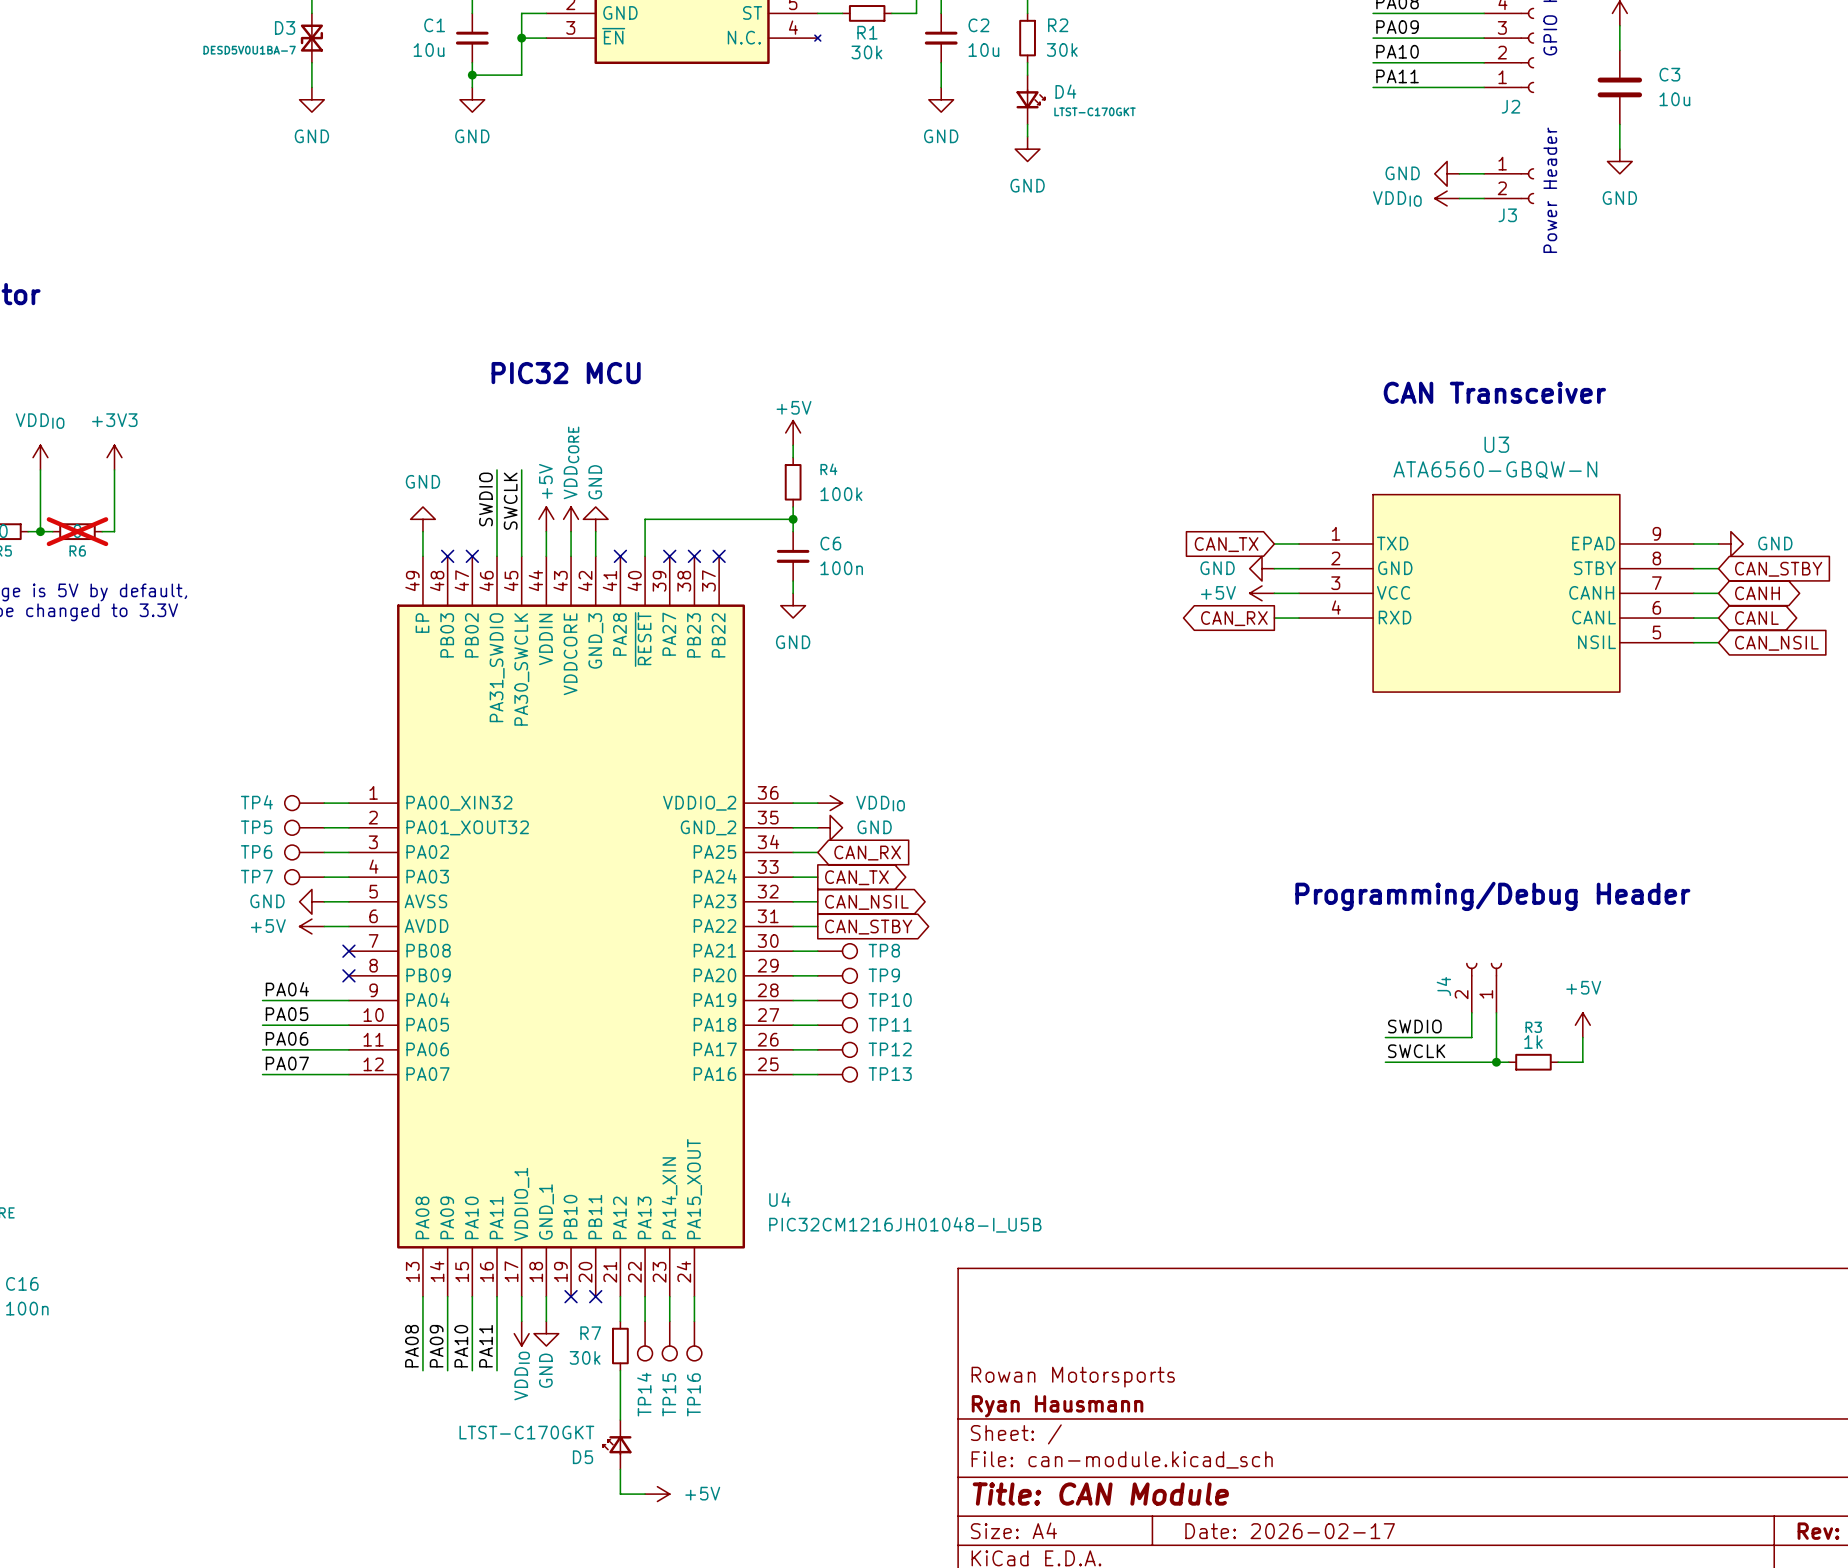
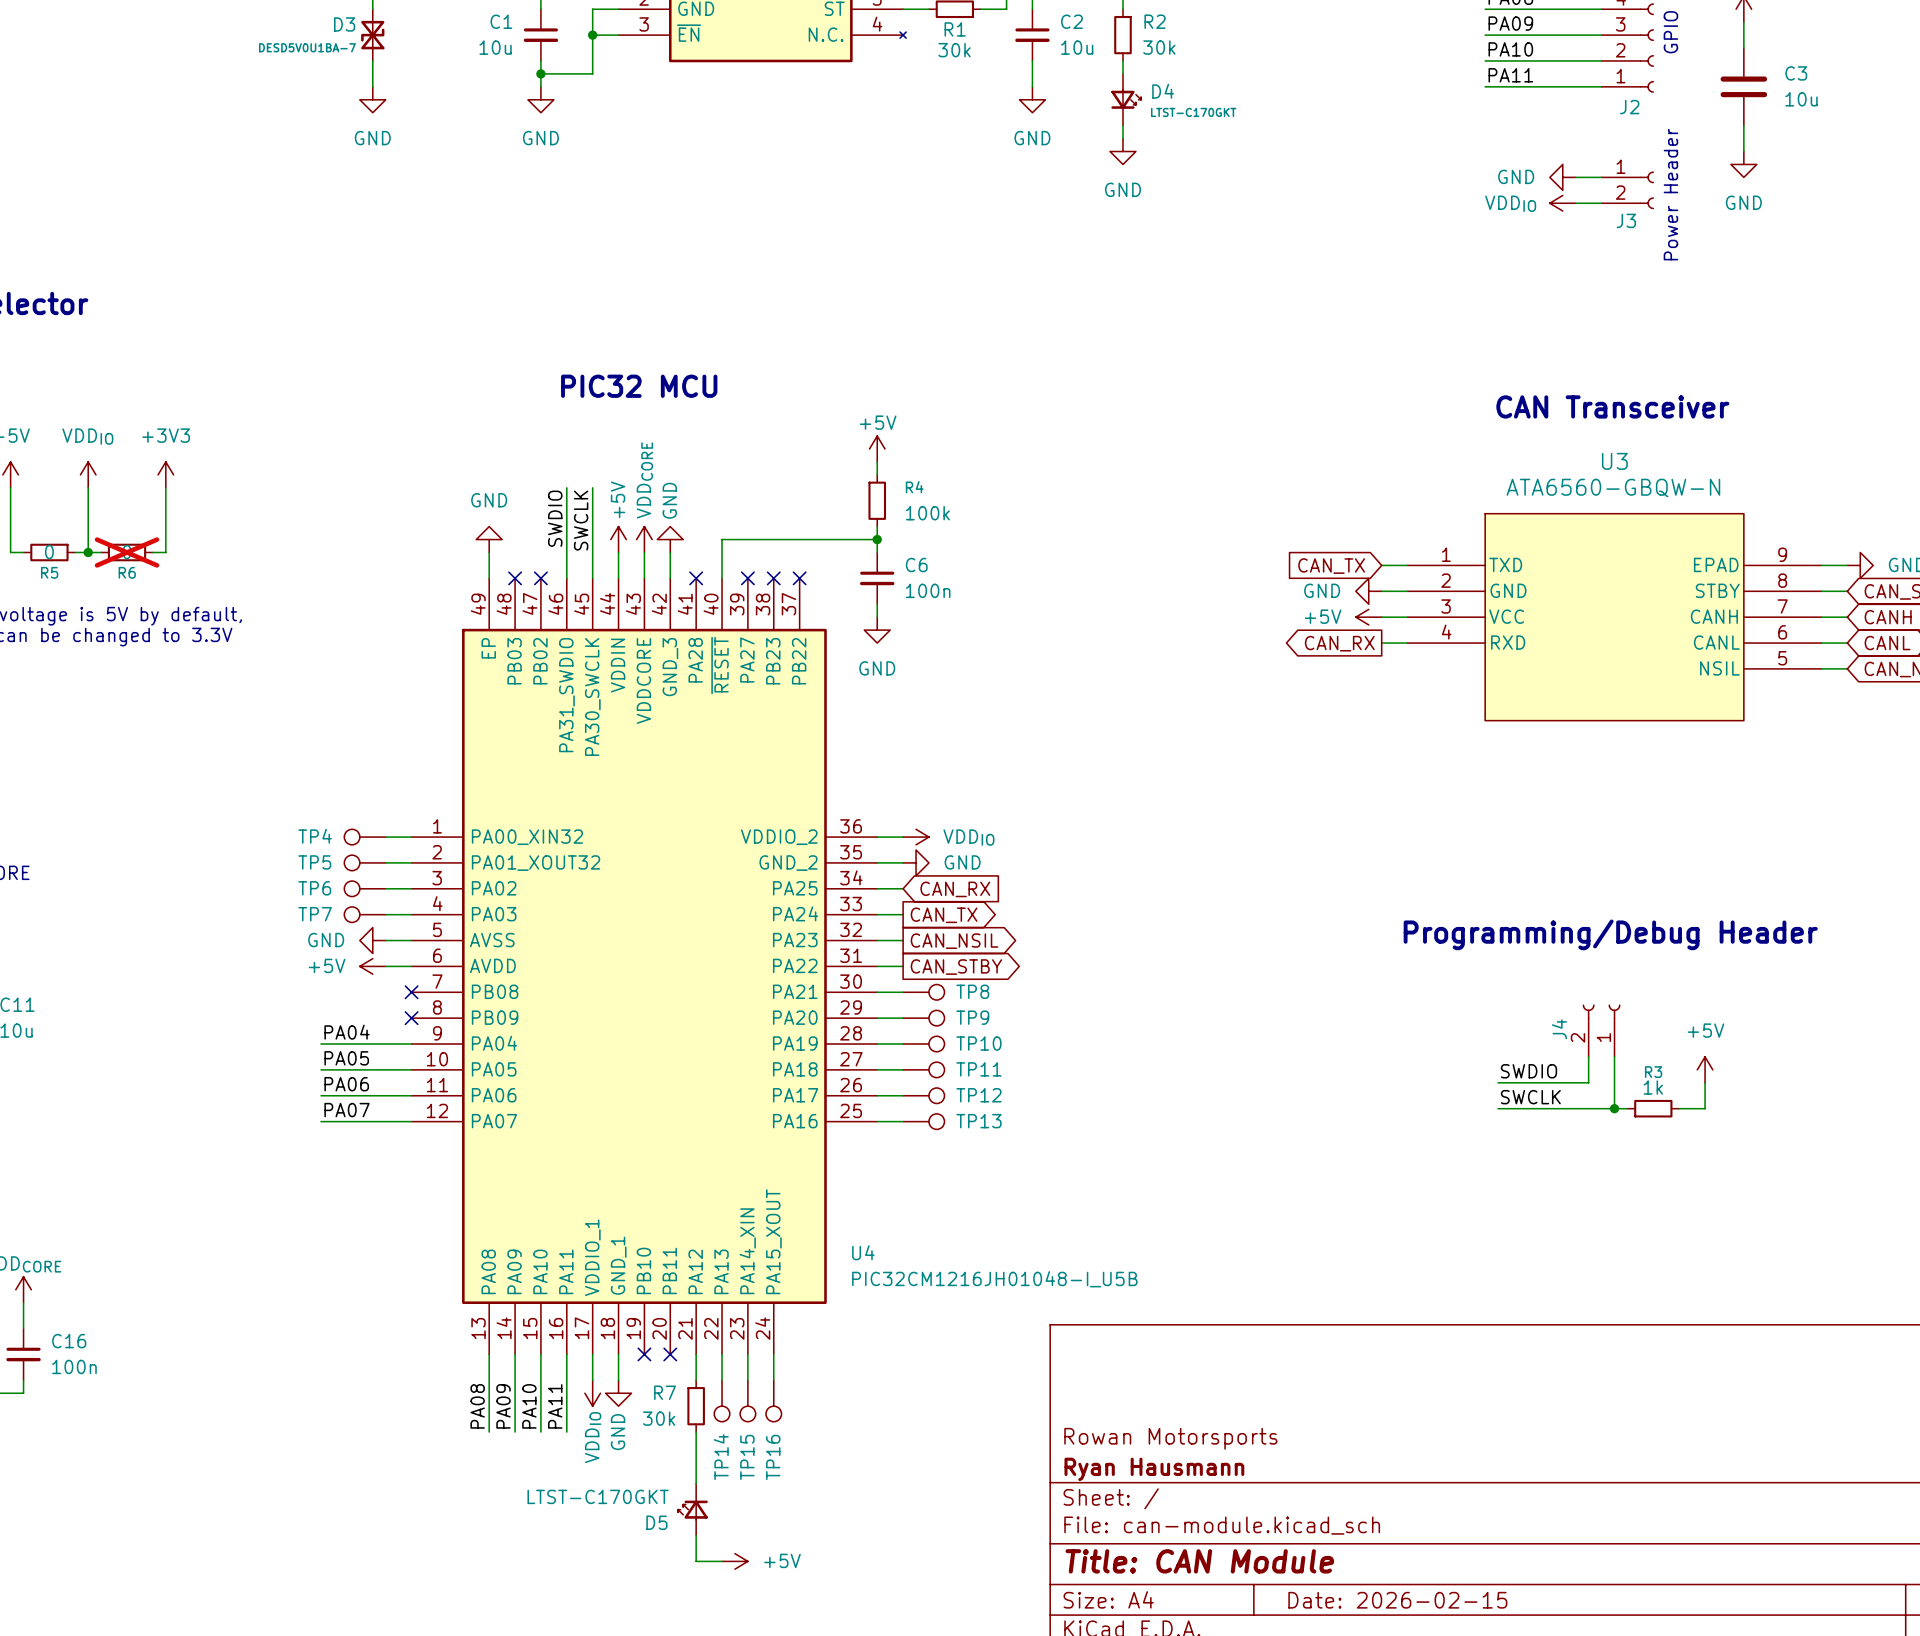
title block: Date: 2026-02-17 (1290, 1531) -> Date: 2026-02-15 (1397, 1600)

